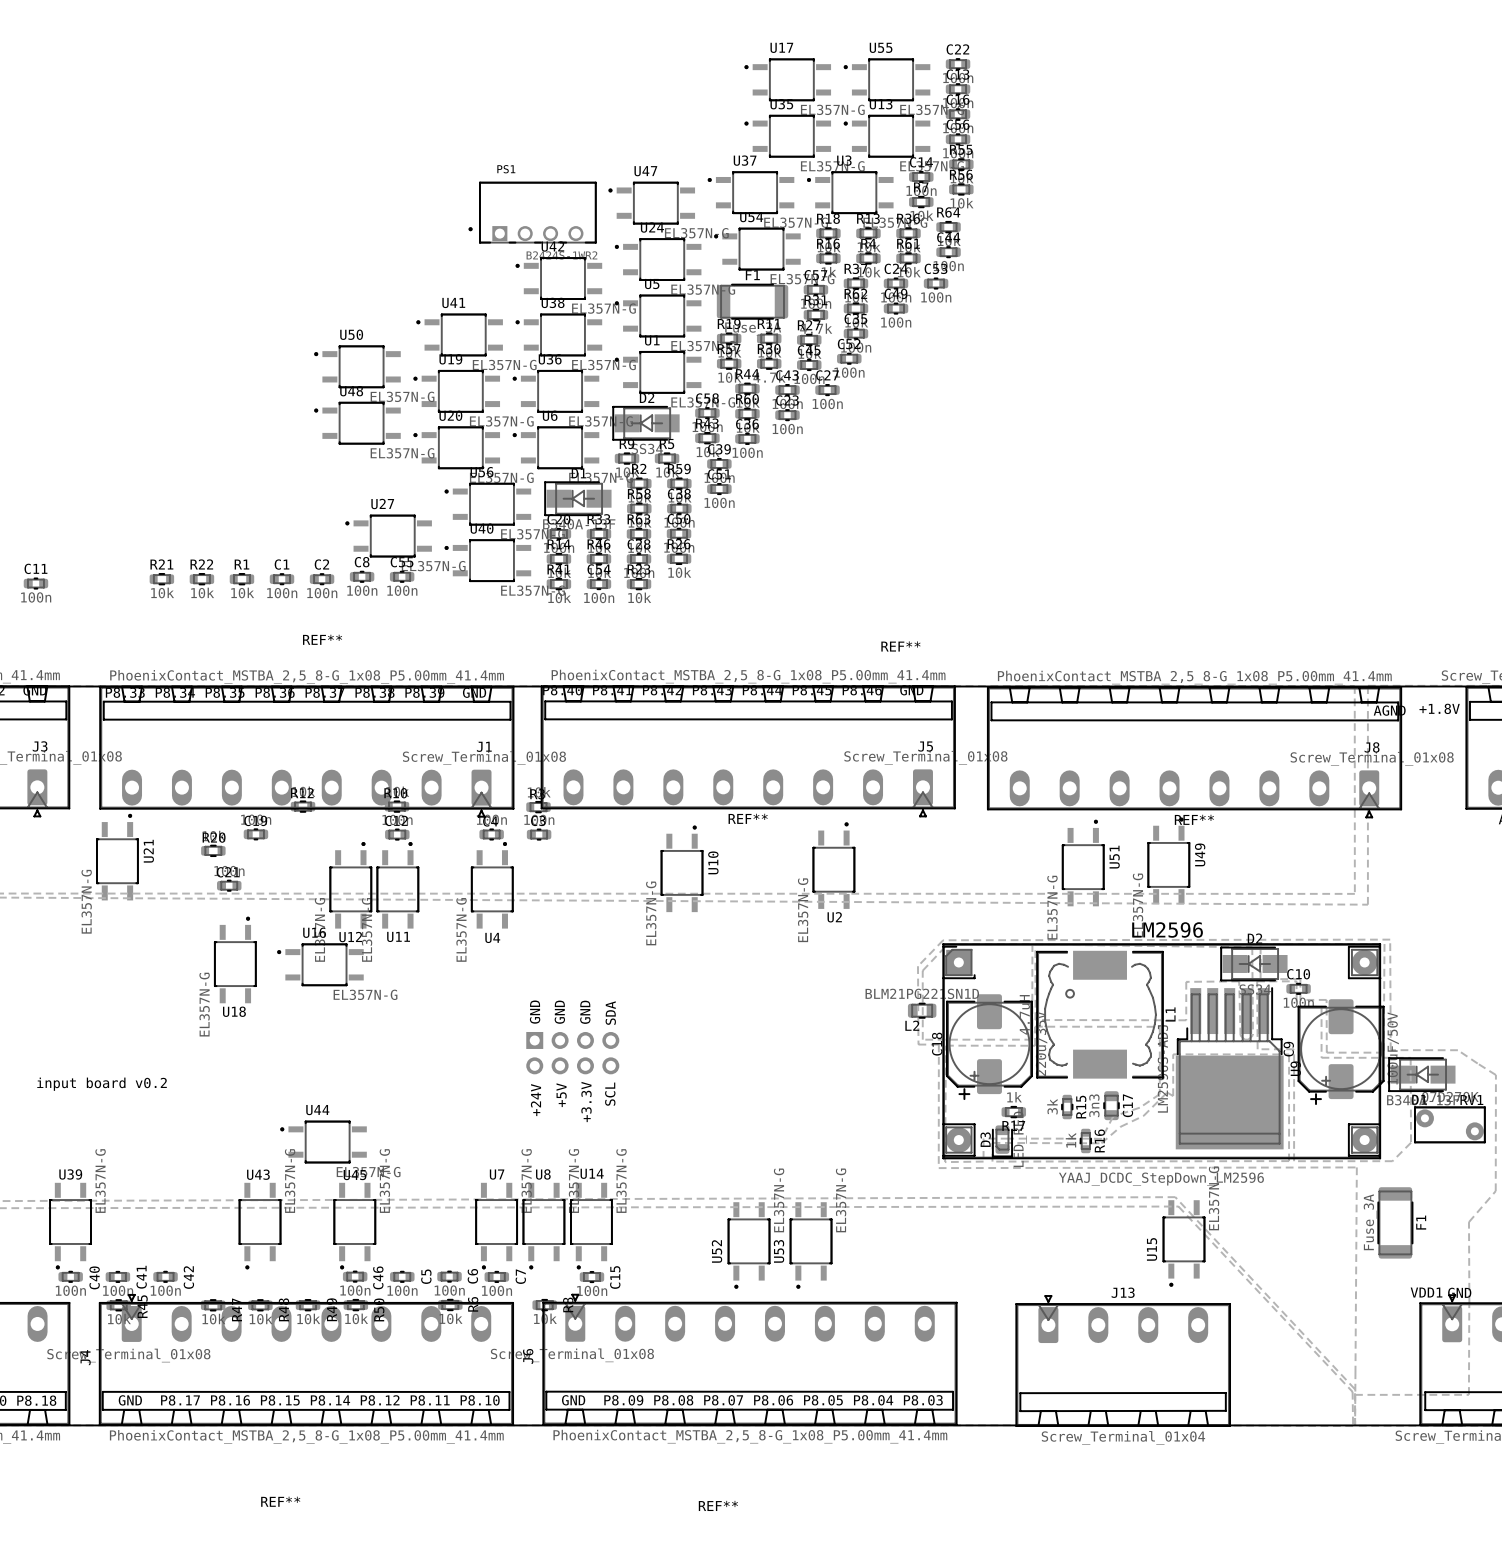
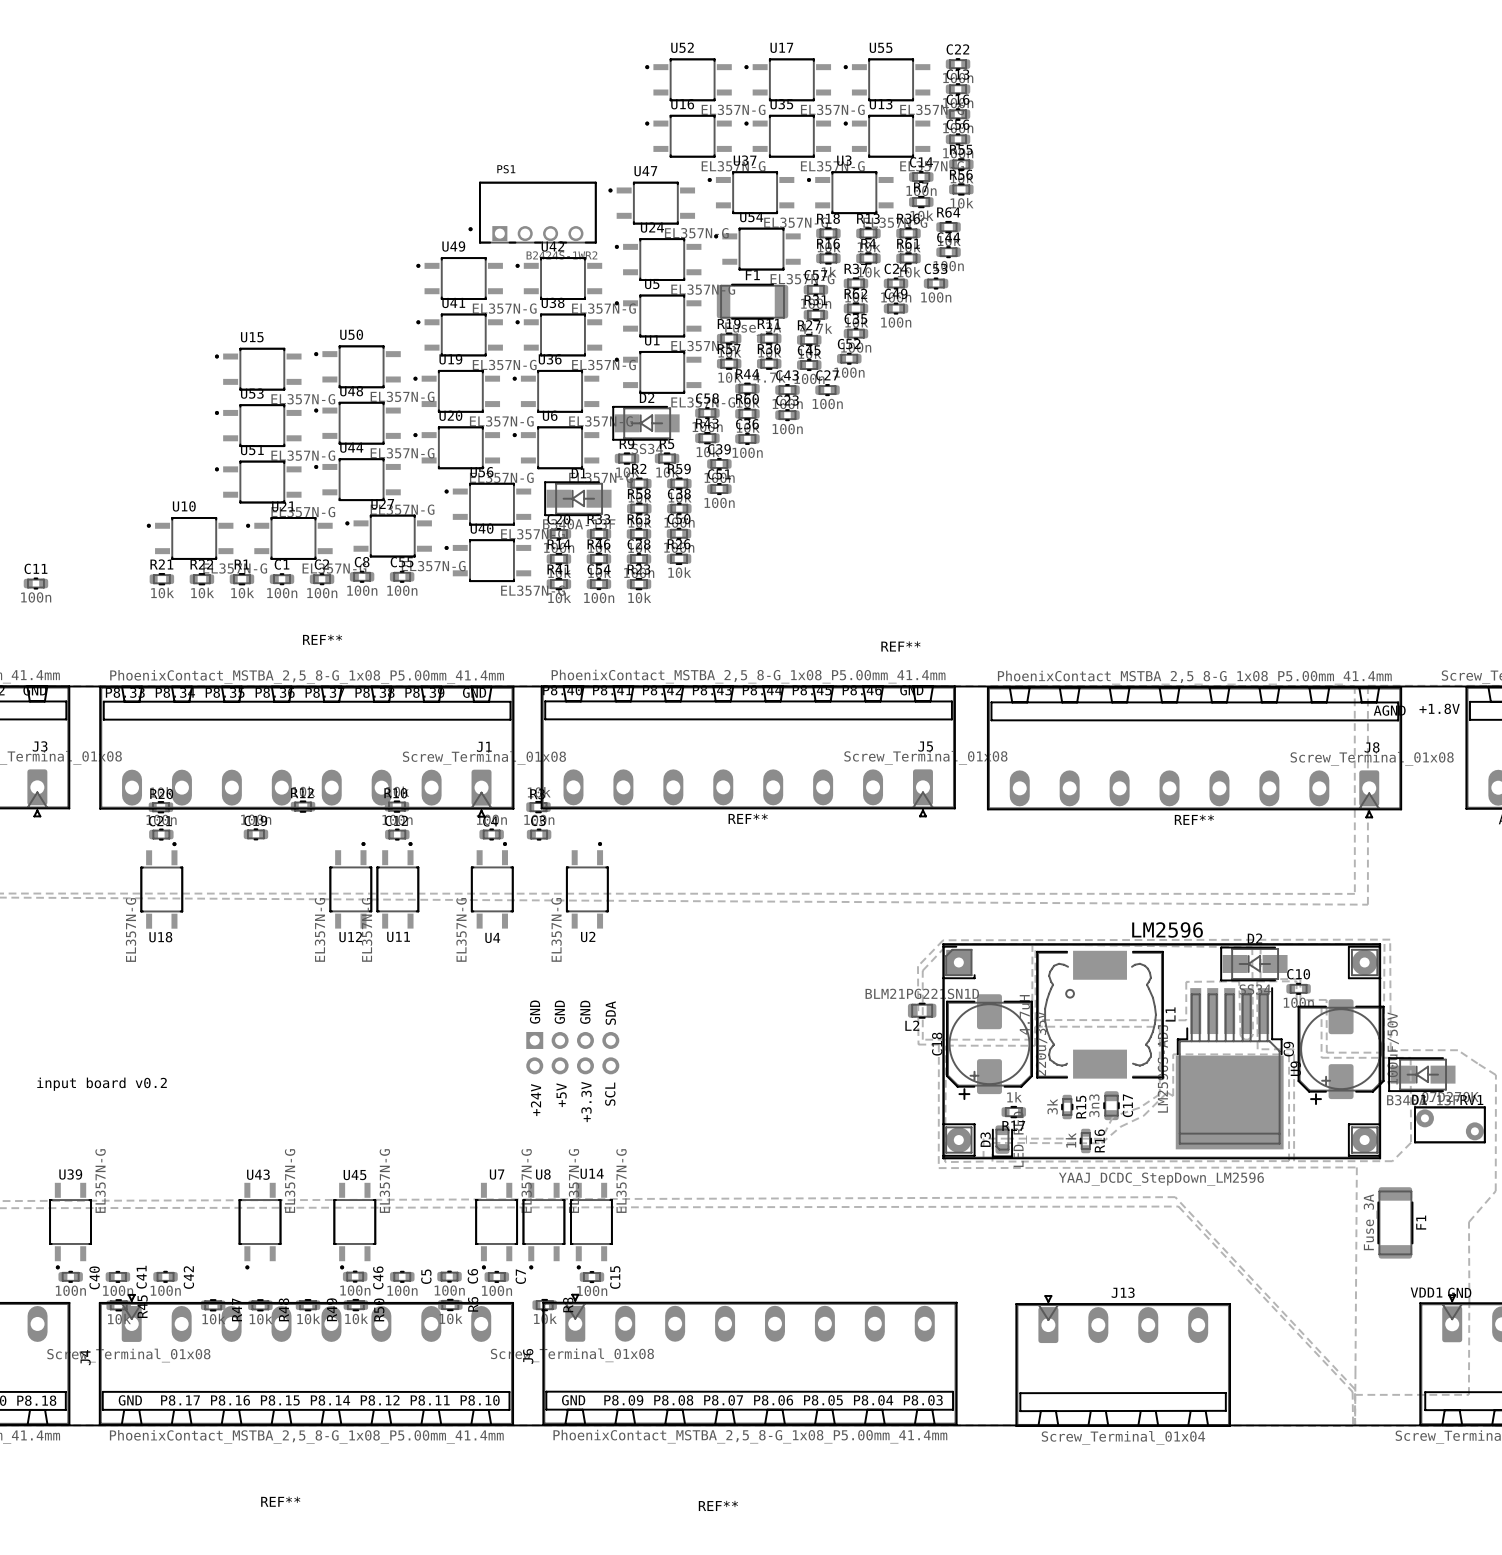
R20 position: (213, 850) -> (160, 807)
U21 rotation: 0° (117, 857) -> 90° counterclockwise (289, 538)
U21 position: (117, 857) -> (289, 538)
U49 rotation: 0° (1168, 860) -> 90° counterclockwise (459, 278)
U49 position: (1168, 860) -> (459, 278)
U51 rotation: 0° (1083, 863) -> 90° counterclockwise (258, 482)
U51 position: (1083, 863) -> (258, 482)
U2 position: (833, 865) -> (587, 885)
U10 rotation: 0° (682, 868) -> 90° counterclockwise (190, 538)
U10 position: (682, 868) -> (190, 538)
C21 position: (229, 885) -> (161, 834)
U18 position: (235, 960) -> (161, 885)
U16 position: (320, 964) -> (688, 136)
U44 position: (323, 1142) -> (357, 479)
U15 rotation: 0° (1184, 1243) -> 90° clockwise (258, 369)
U15 position: (1184, 1243) -> (258, 369)
U52 rotation: 0° (749, 1245) -> 90° clockwise (688, 79)
U52 position: (749, 1245) -> (688, 79)
U53 rotation: 0° (811, 1245) -> 90° clockwise (258, 425)
U53 position: (811, 1245) -> (258, 425)

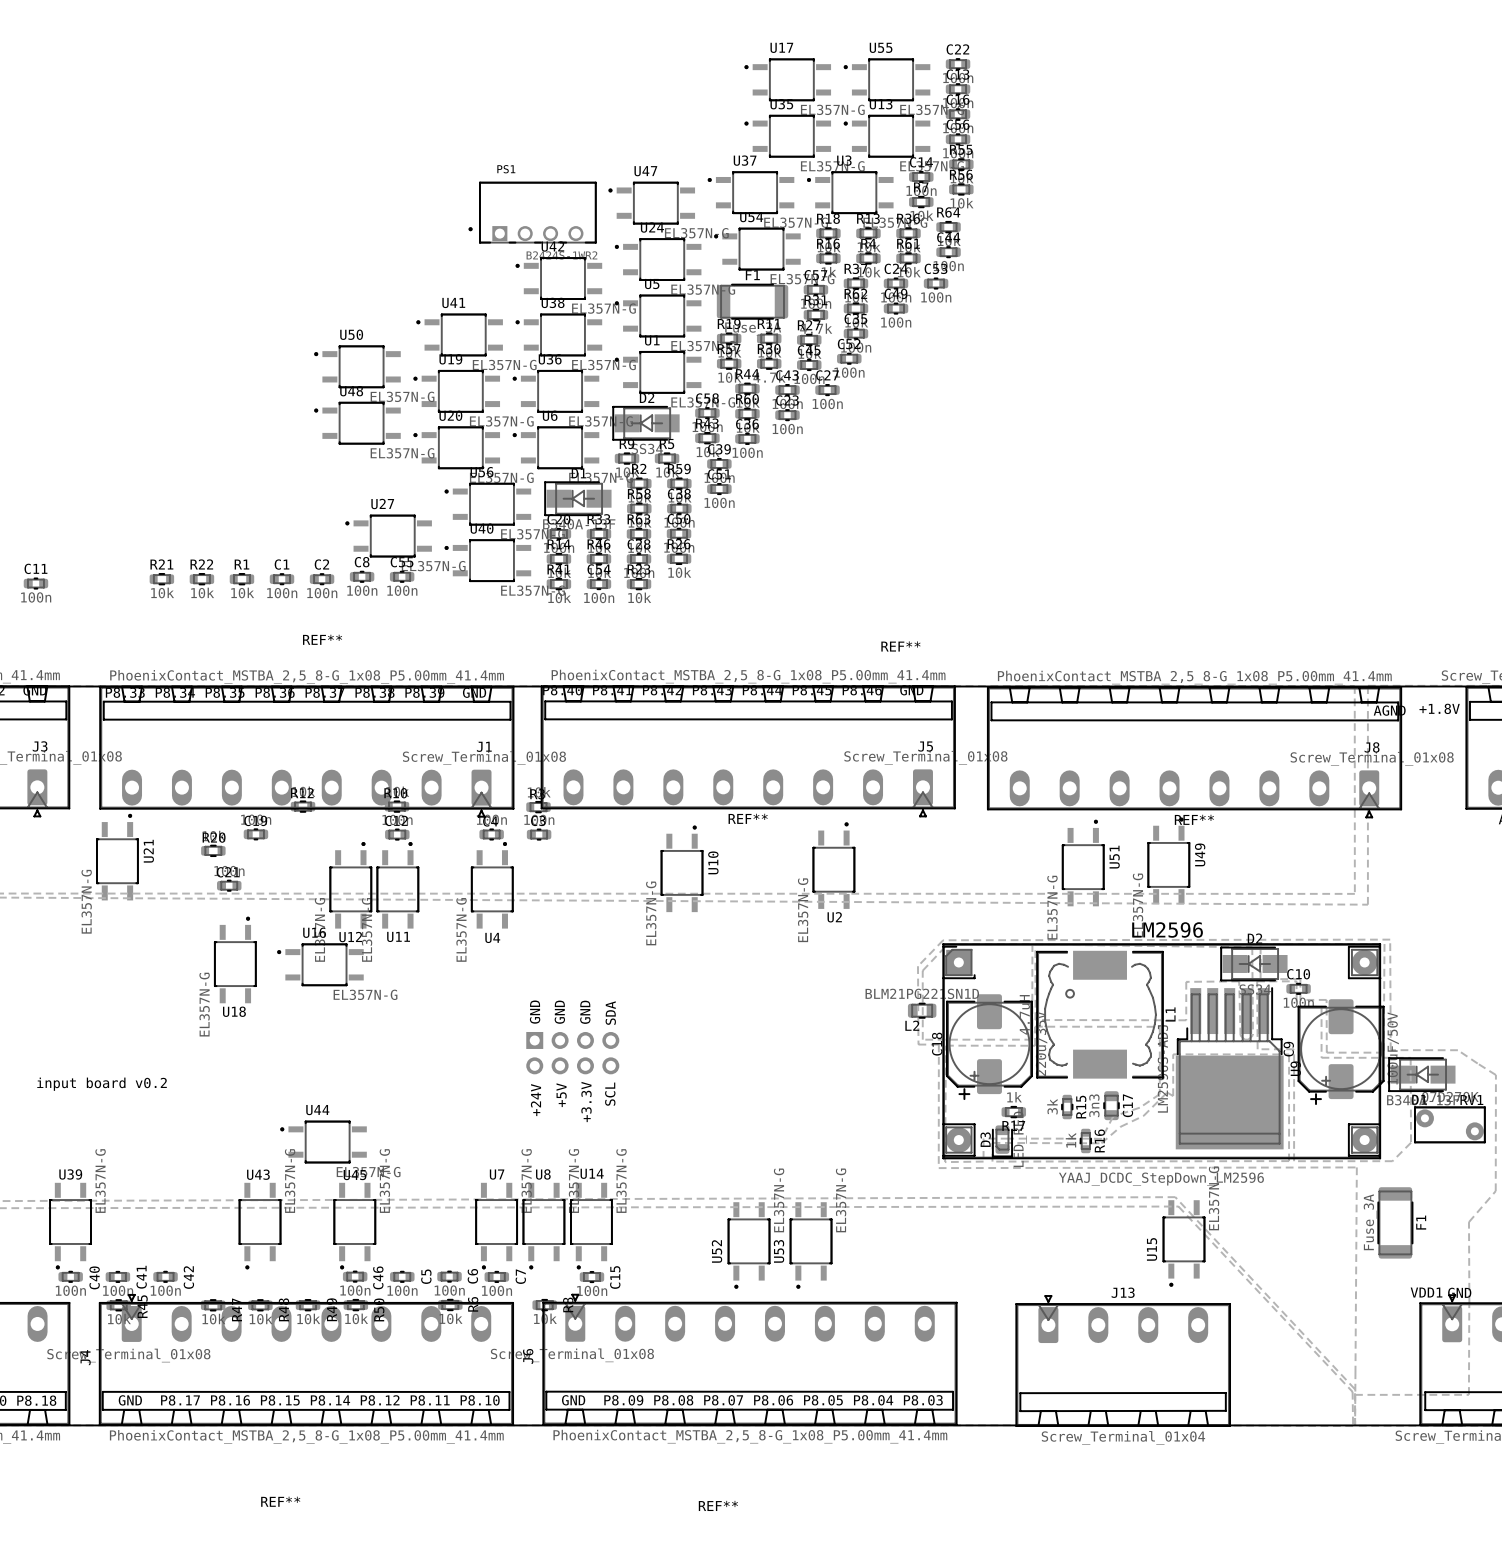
U52 rotation: 0° (688, 79) -> 90° counterclockwise (749, 1245)
U52 position: (688, 79) -> (749, 1245)
U16 position: (688, 136) -> (320, 964)
U49 rotation: 0° (459, 278) -> 90° clockwise (1168, 860)
U49 position: (459, 278) -> (1168, 860)
U15 rotation: 0° (258, 369) -> 90° counterclockwise (1184, 1243)
U15 position: (258, 369) -> (1184, 1243)
U53 rotation: 0° (258, 425) -> 90° counterclockwise (811, 1245)
U53 position: (258, 425) -> (811, 1245)
U44 position: (357, 479) -> (323, 1142)
U51 rotation: 0° (258, 482) -> 90° clockwise (1083, 863)
U51 position: (258, 482) -> (1083, 863)
U10 rotation: 0° (190, 538) -> 90° clockwise (682, 868)
U10 position: (190, 538) -> (682, 868)
U21 rotation: 0° (289, 538) -> 90° clockwise (117, 857)
U21 position: (289, 538) -> (117, 857)
R20 position: (160, 807) -> (213, 850)
C21 position: (161, 834) -> (229, 885)
U18 position: (161, 885) -> (235, 960)
U2 position: (587, 885) -> (833, 865)

